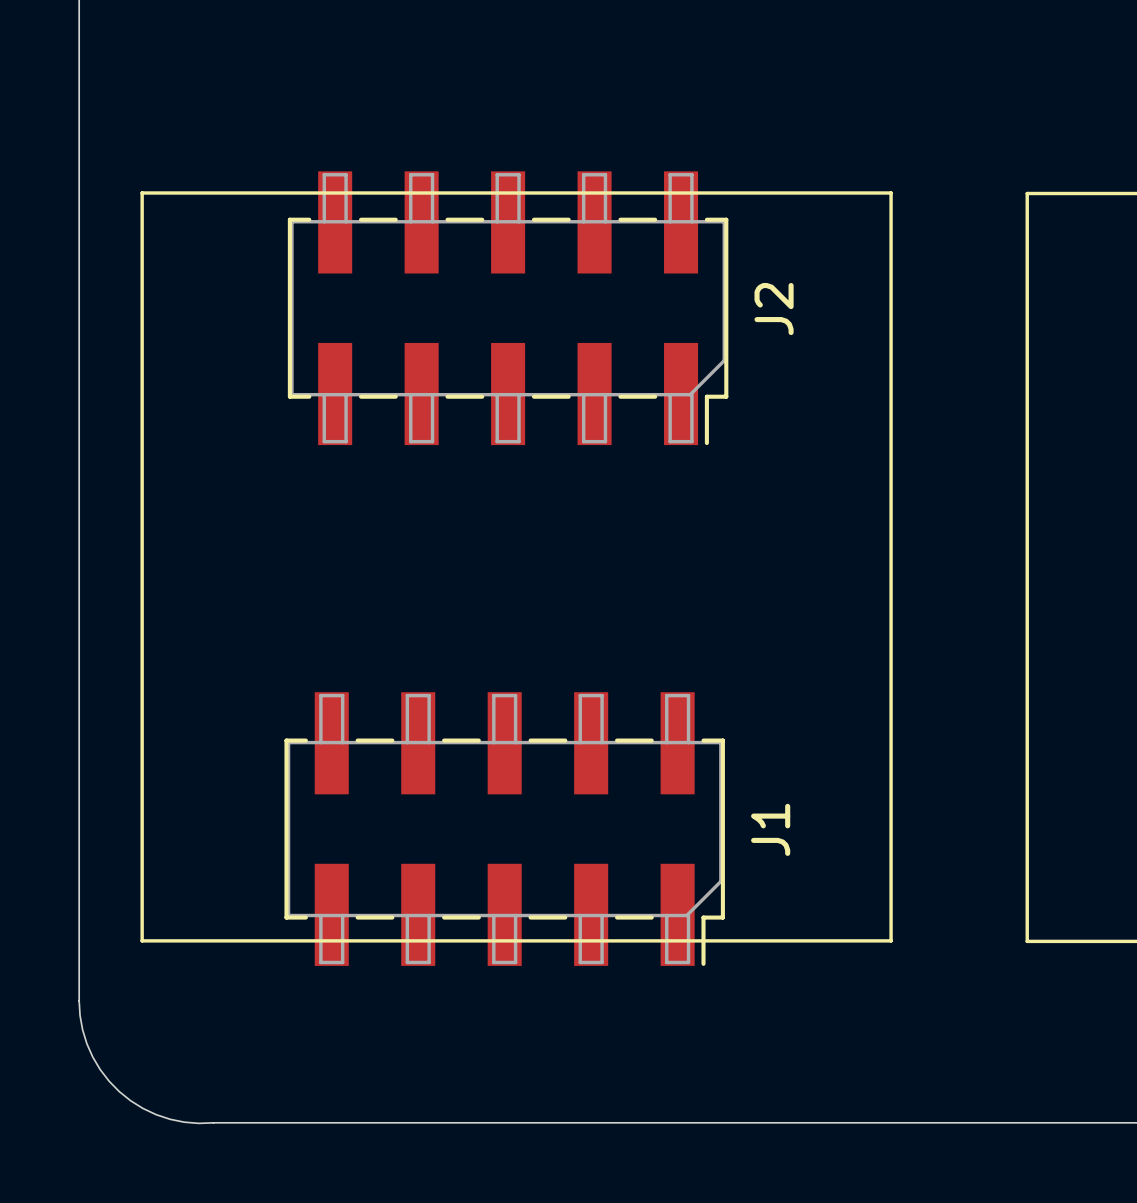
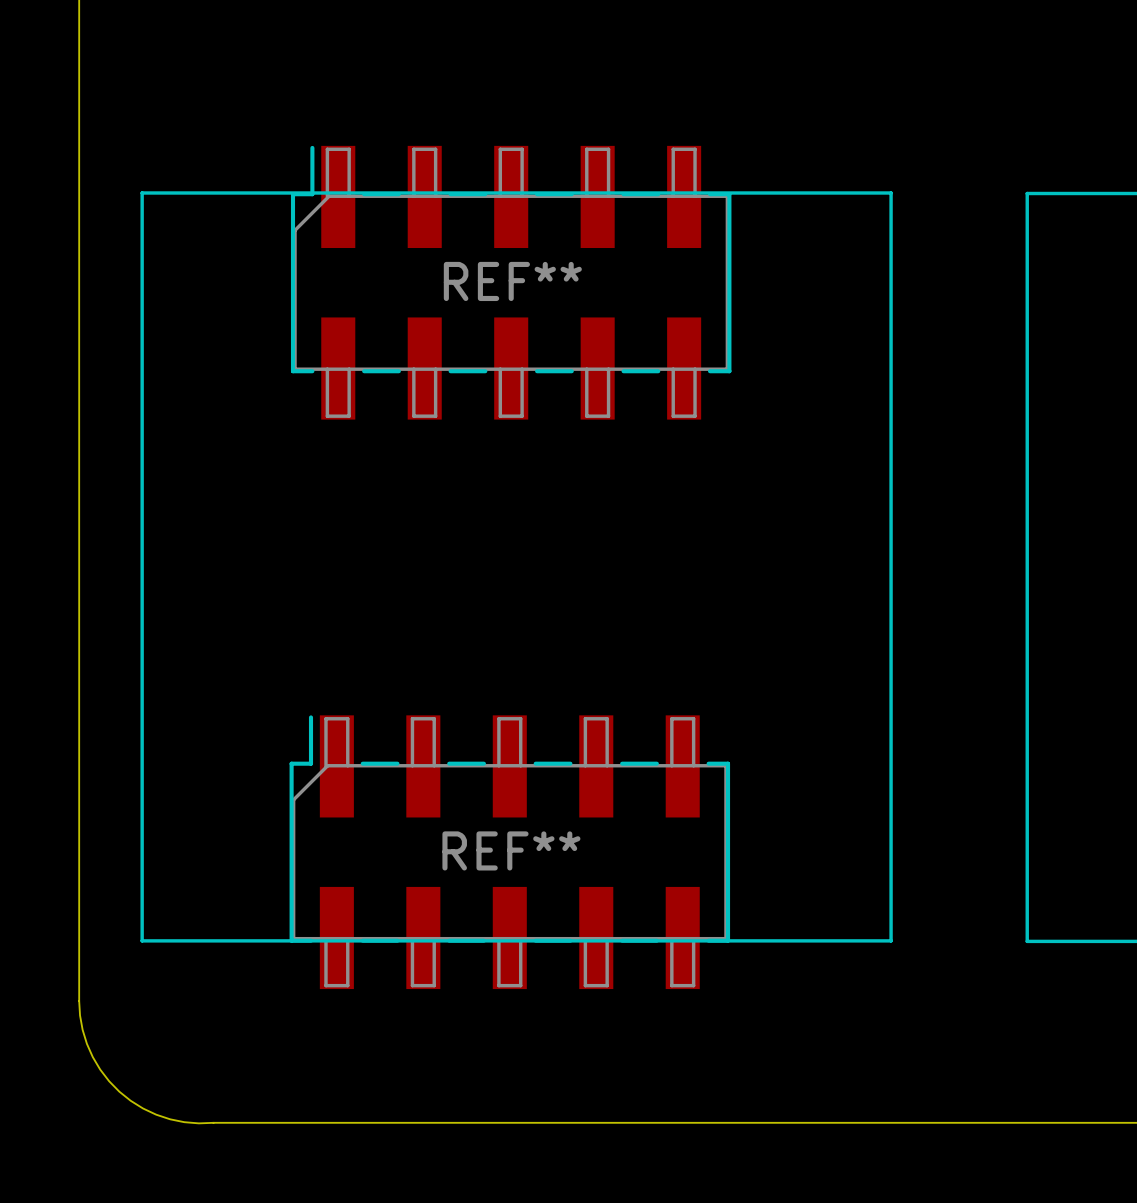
REF**: none -> (511, 282)
J2: (508, 308) -> none
J1: (504, 829) -> none
REF**: none -> (509, 852)

